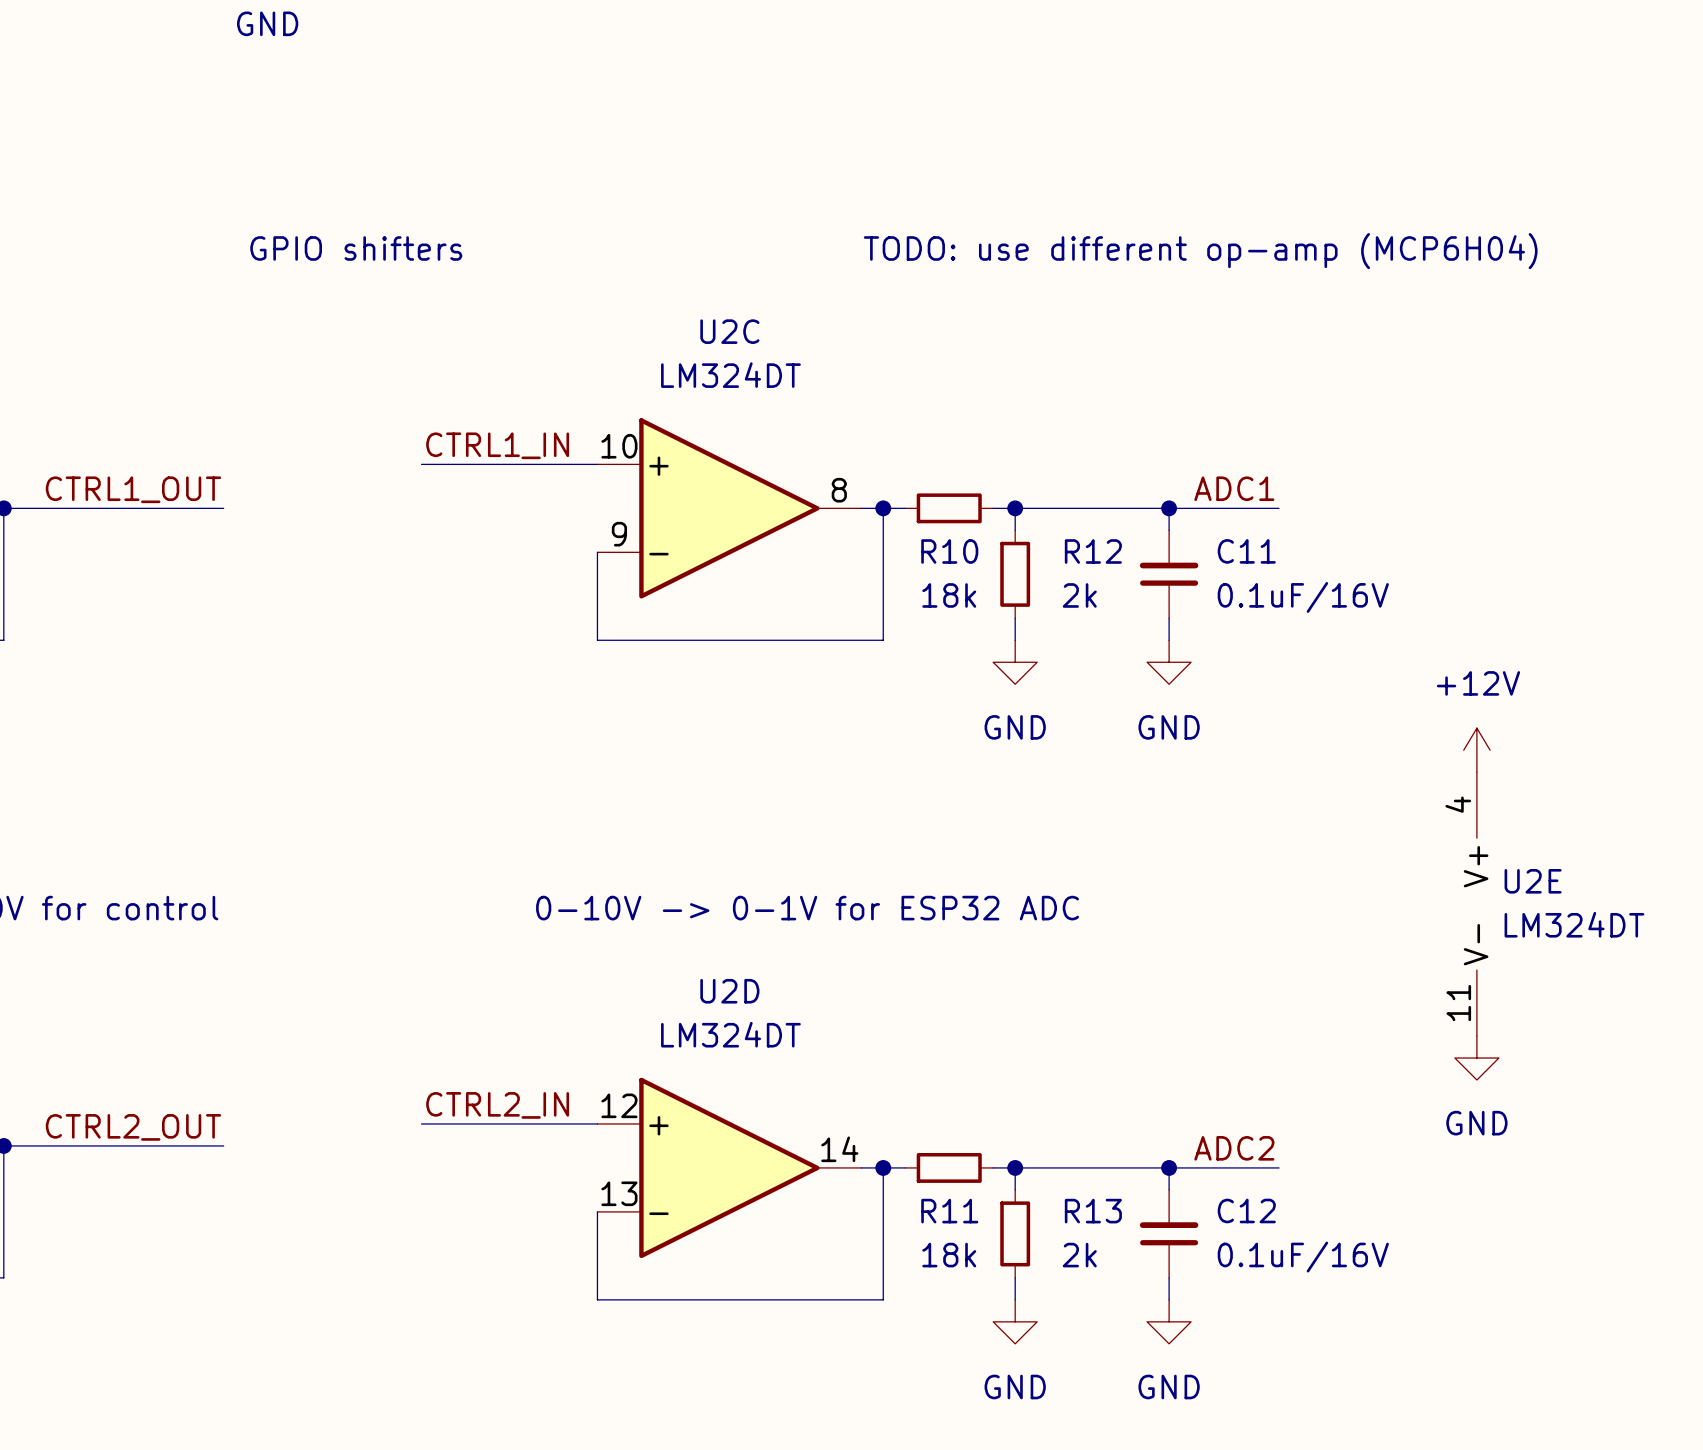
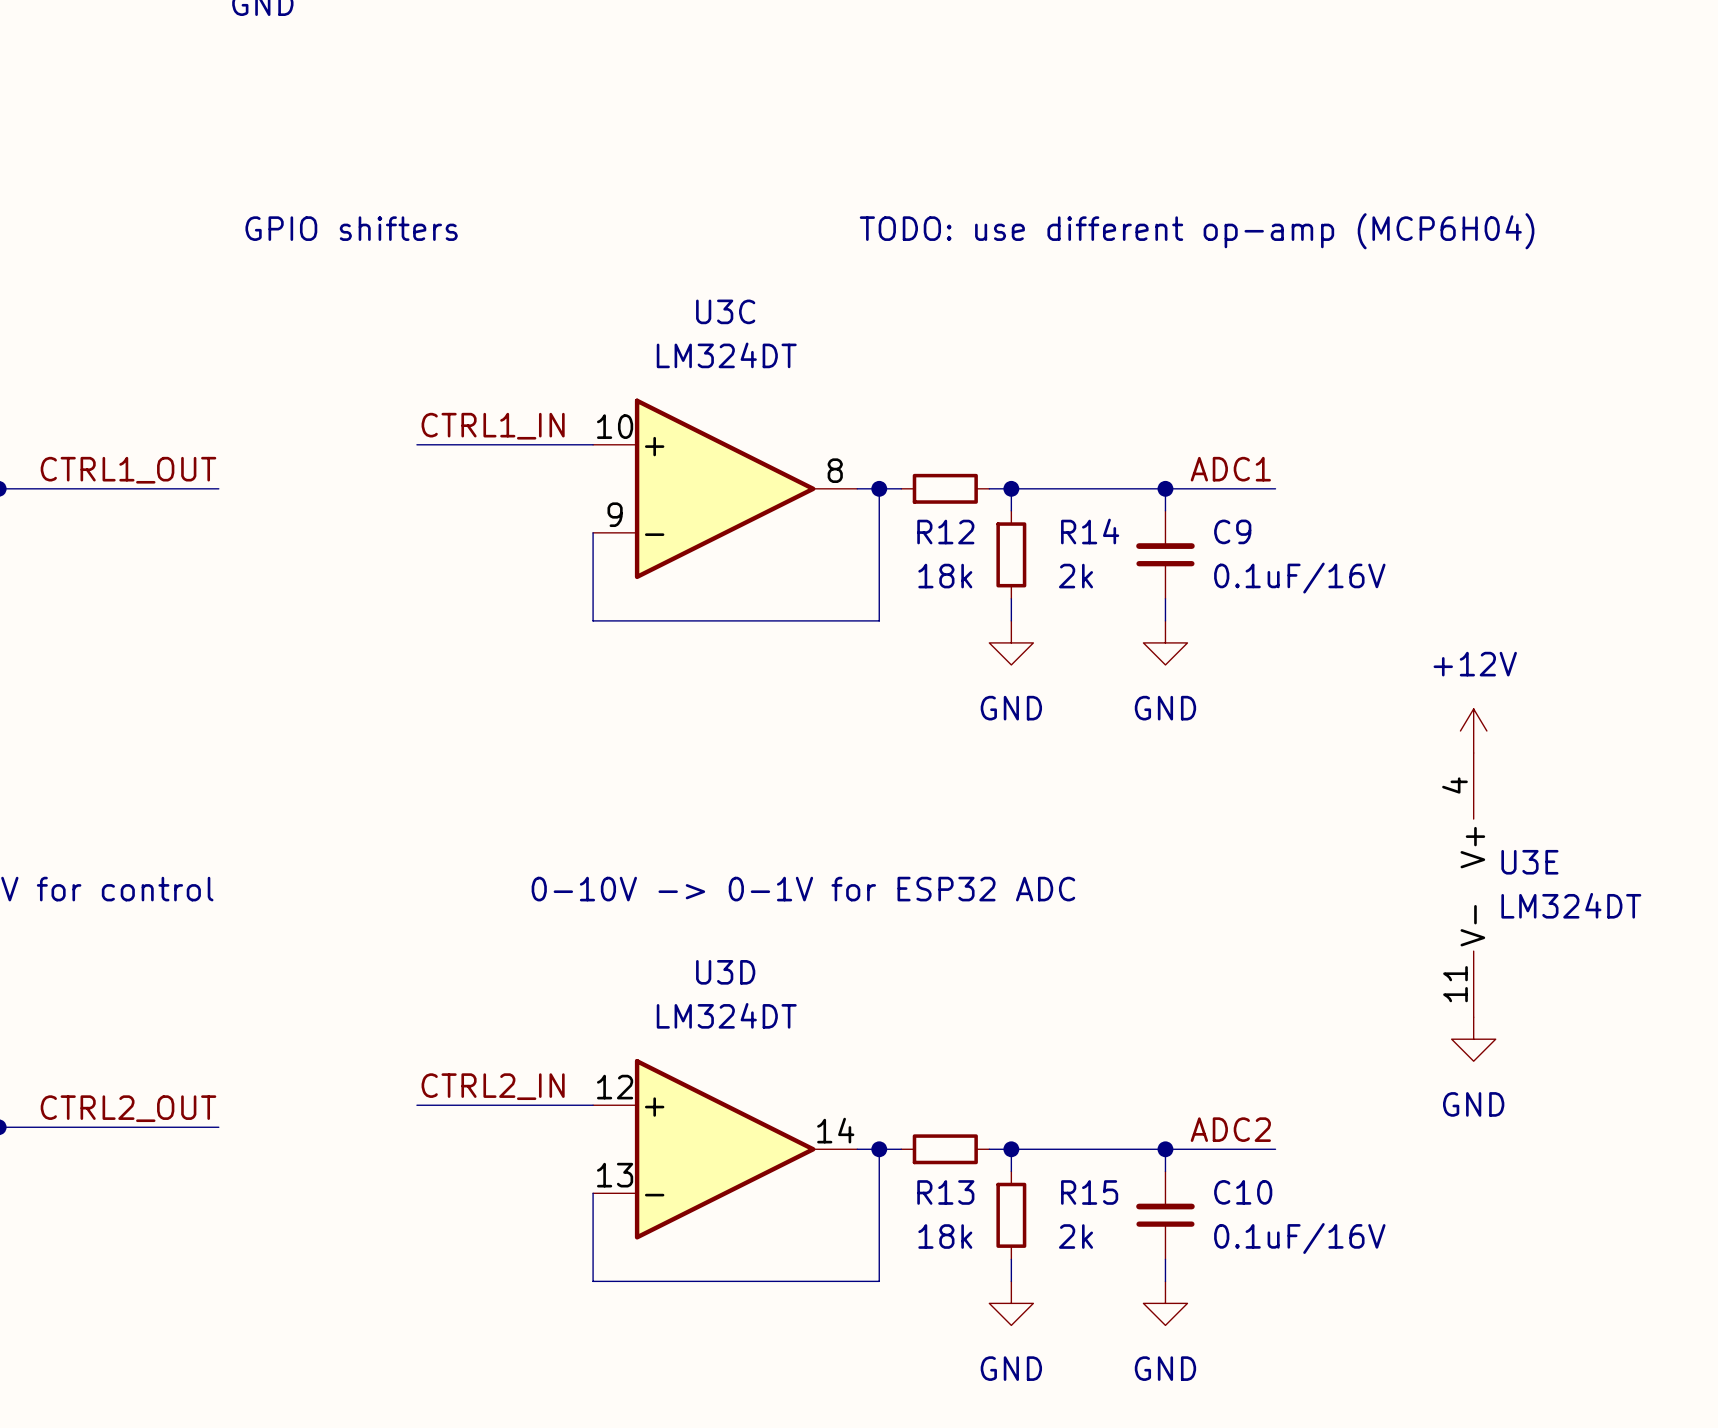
U2C name: U2C (729, 331) -> U3C (725, 311)
R10 name: R10 (949, 551) -> R12 (945, 532)
R12 name: R12 (1093, 551) -> R14 (1090, 531)
C11 name: C11 (1246, 551) -> C9 (1232, 531)
U2E name: U2E (1533, 881) -> U3E (1529, 862)
U2D name: U2D (729, 991) -> U3D (725, 972)
C12 name: C12 (1246, 1210) -> C10 (1243, 1192)
R11 name: R11 (949, 1211) -> R13 (945, 1192)
R13 name: R13 (1093, 1211) -> R15 (1089, 1192)

